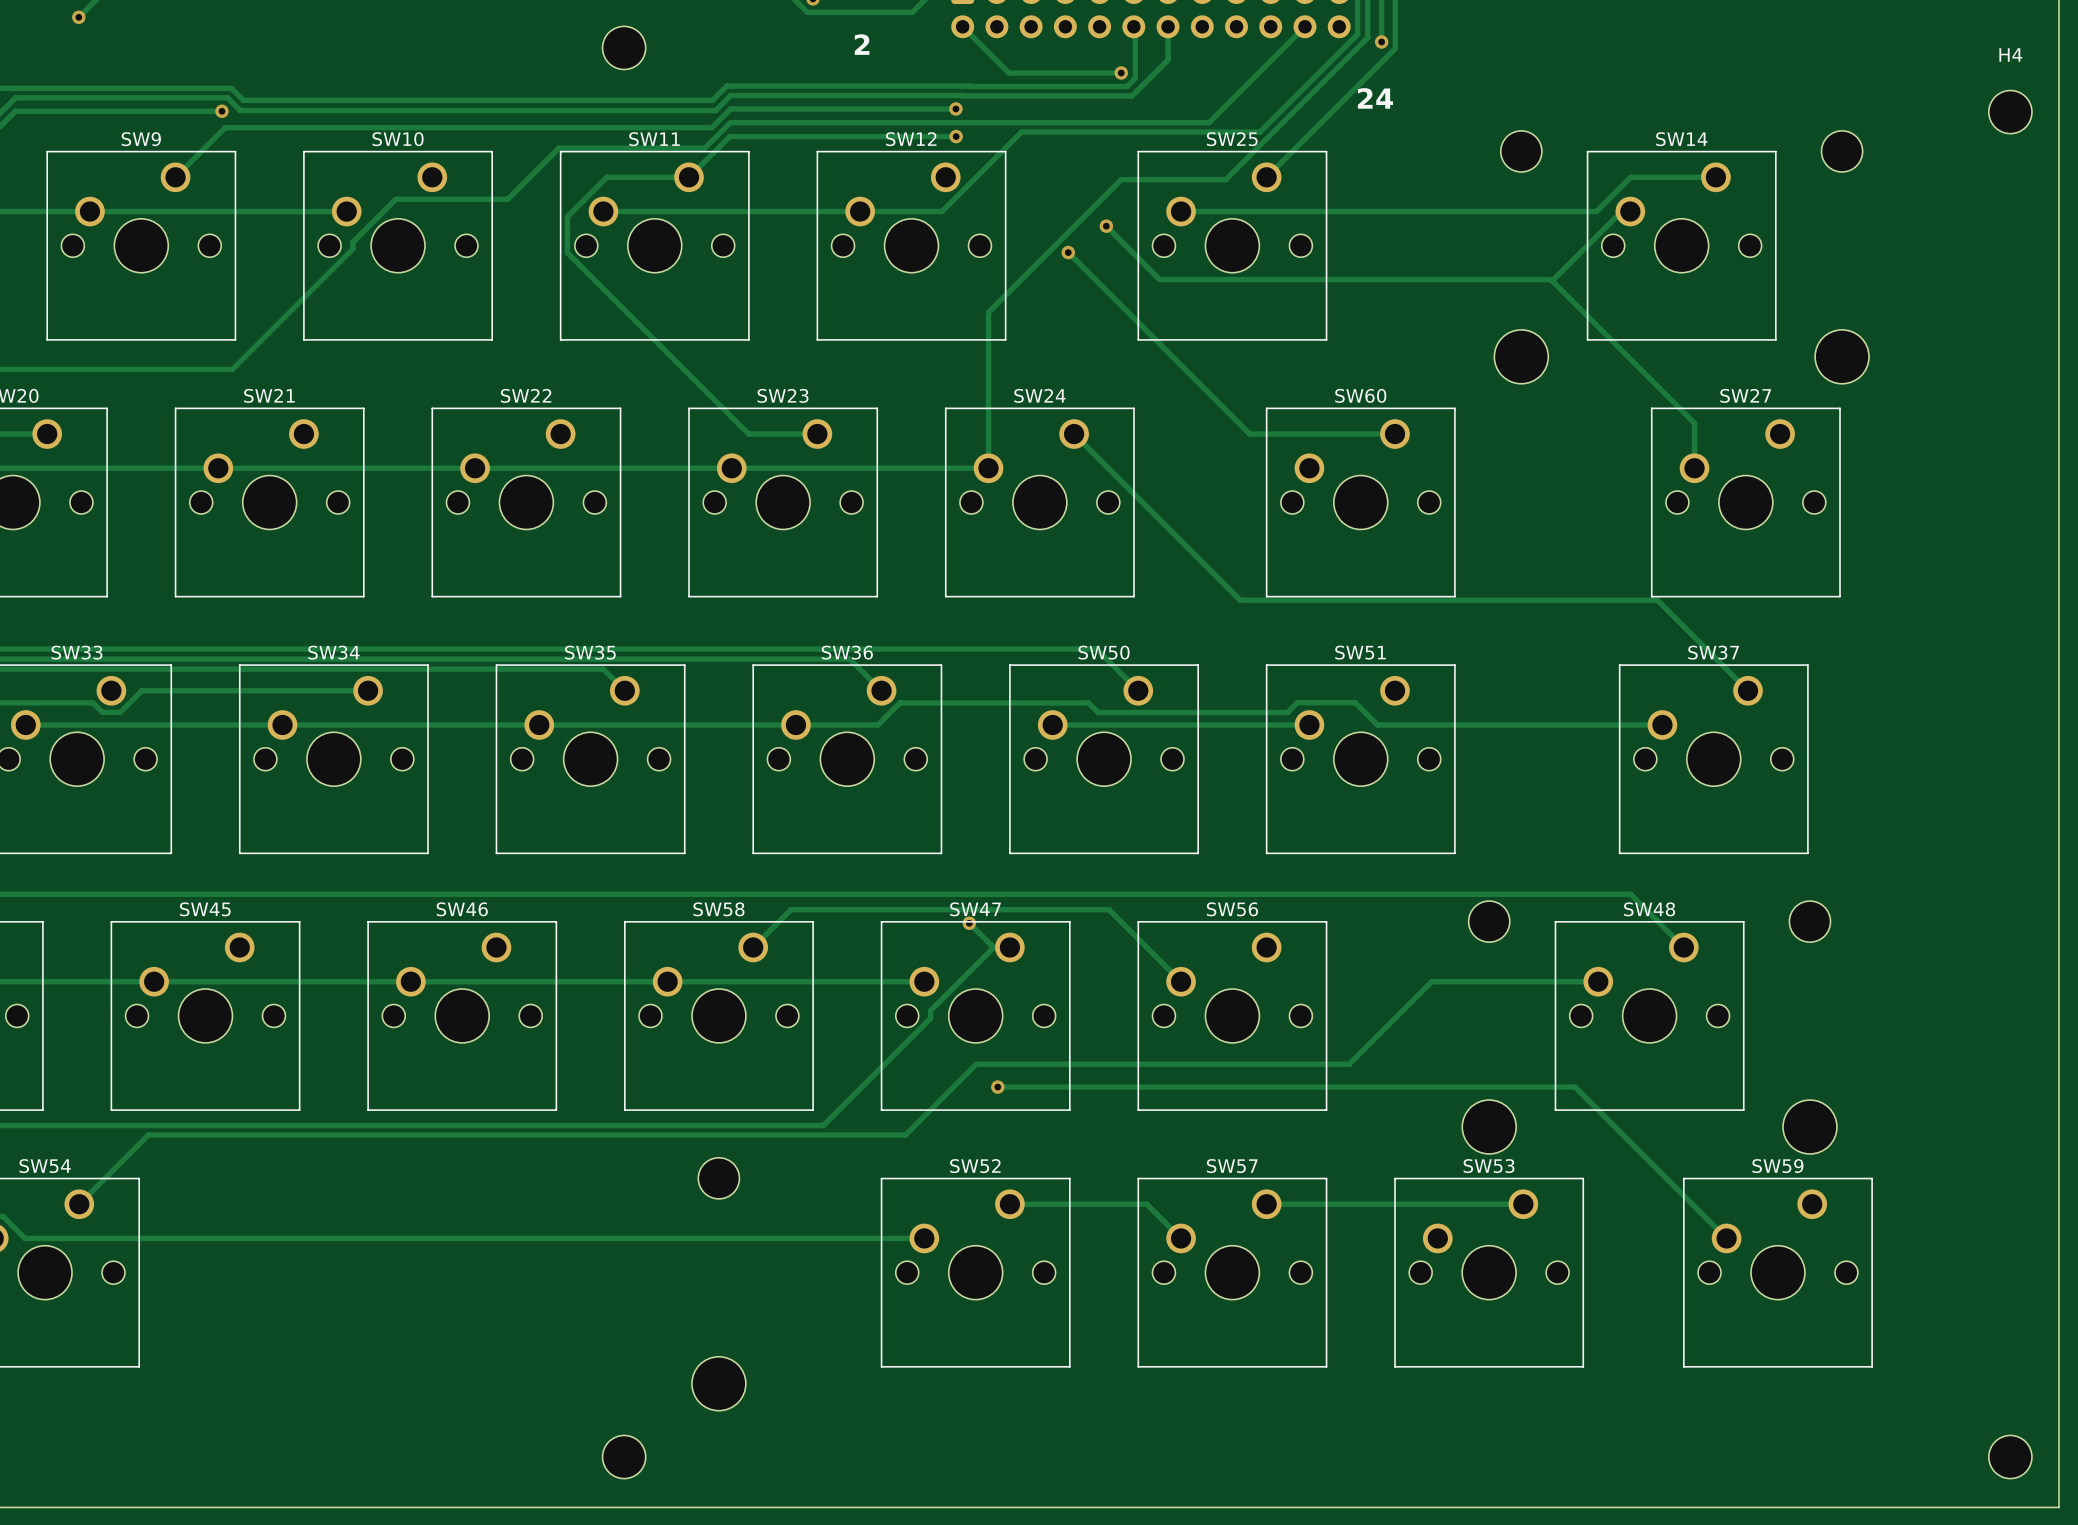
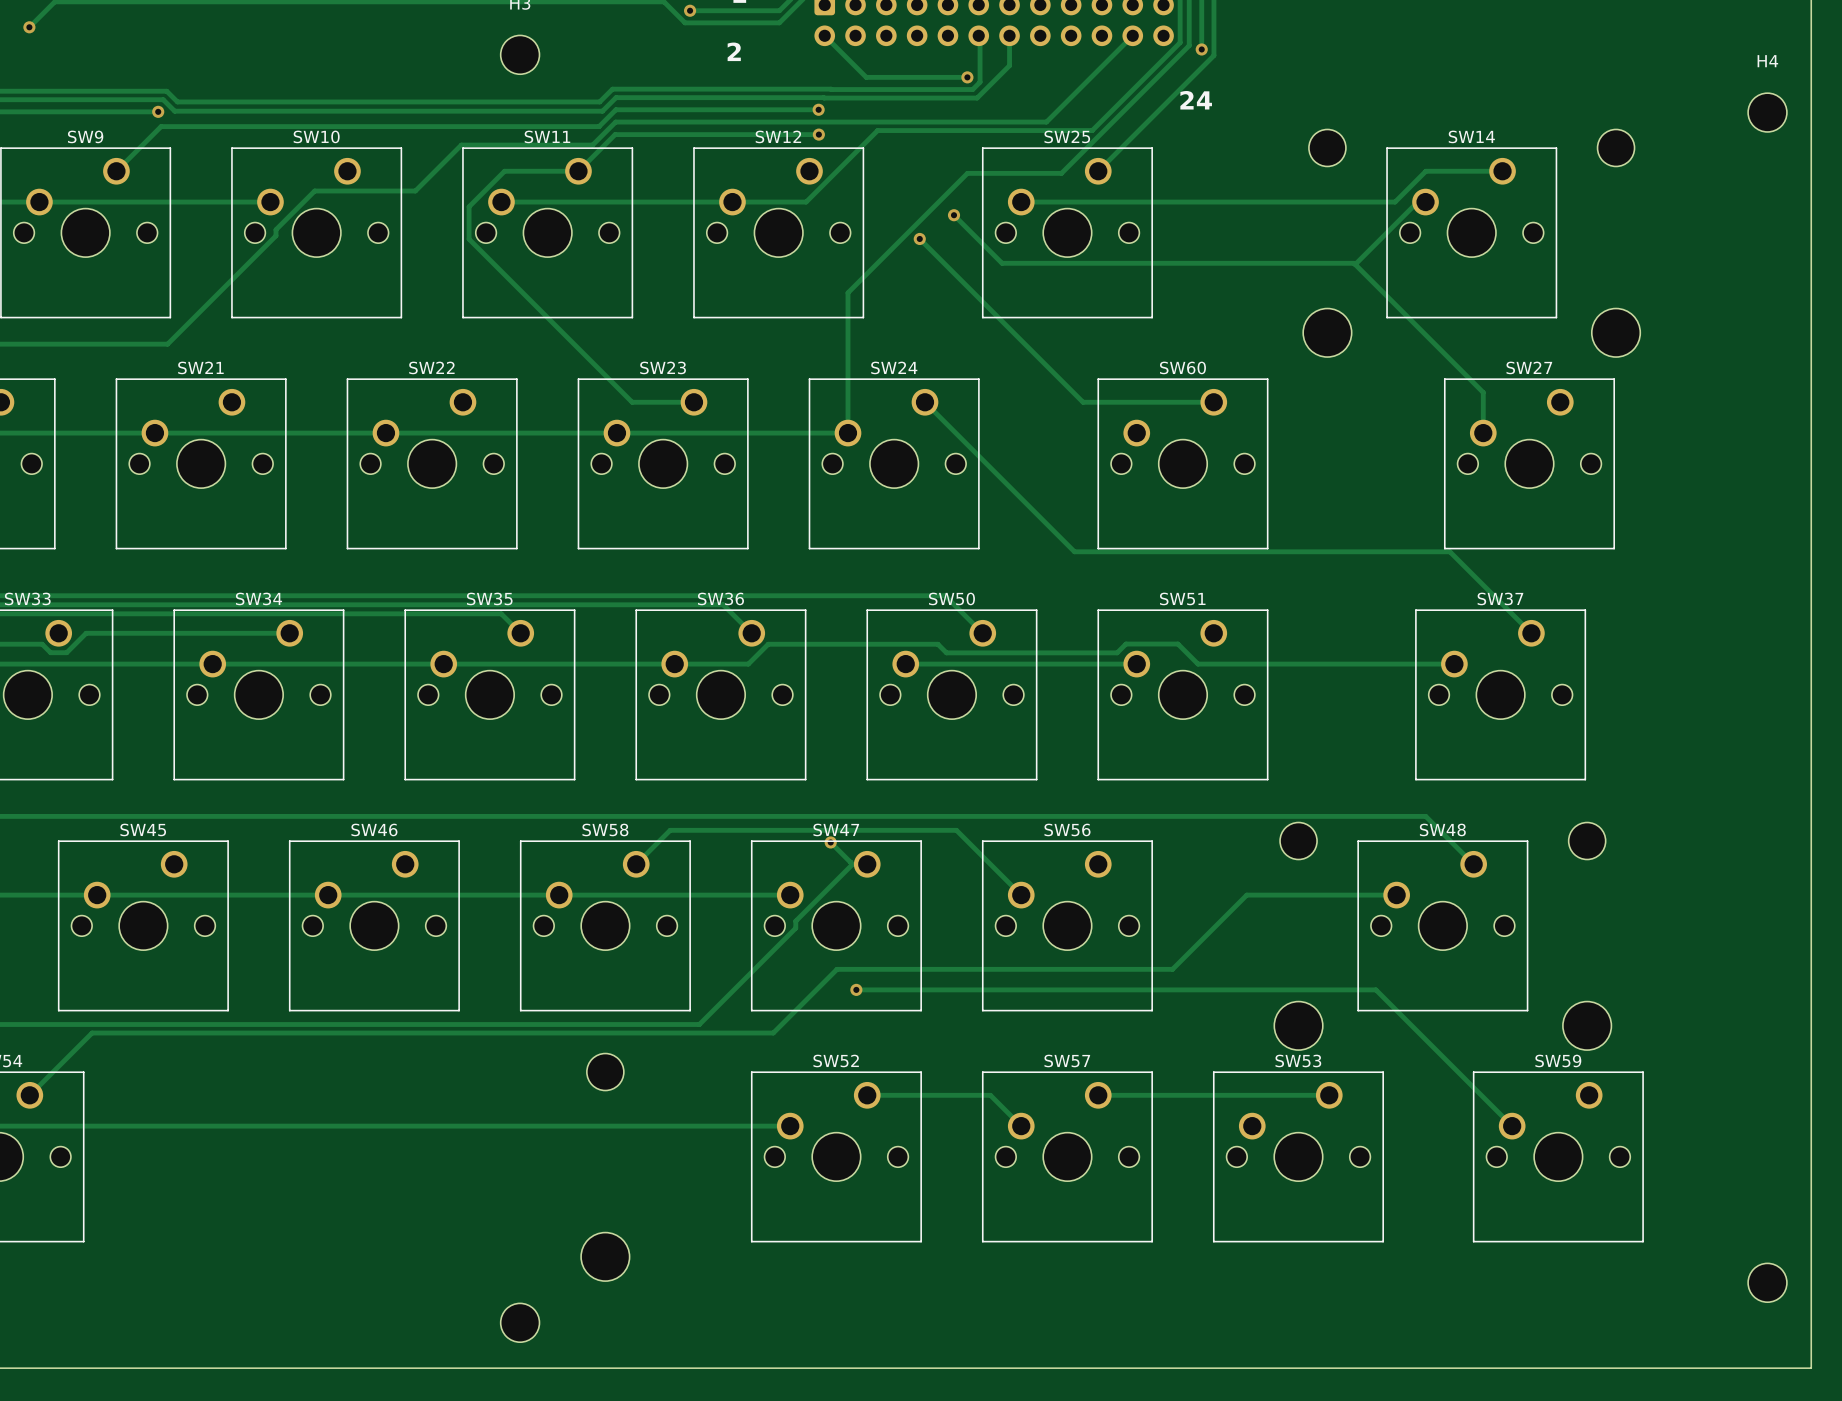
part position: (2010, 1457) -> (1767, 1282)

